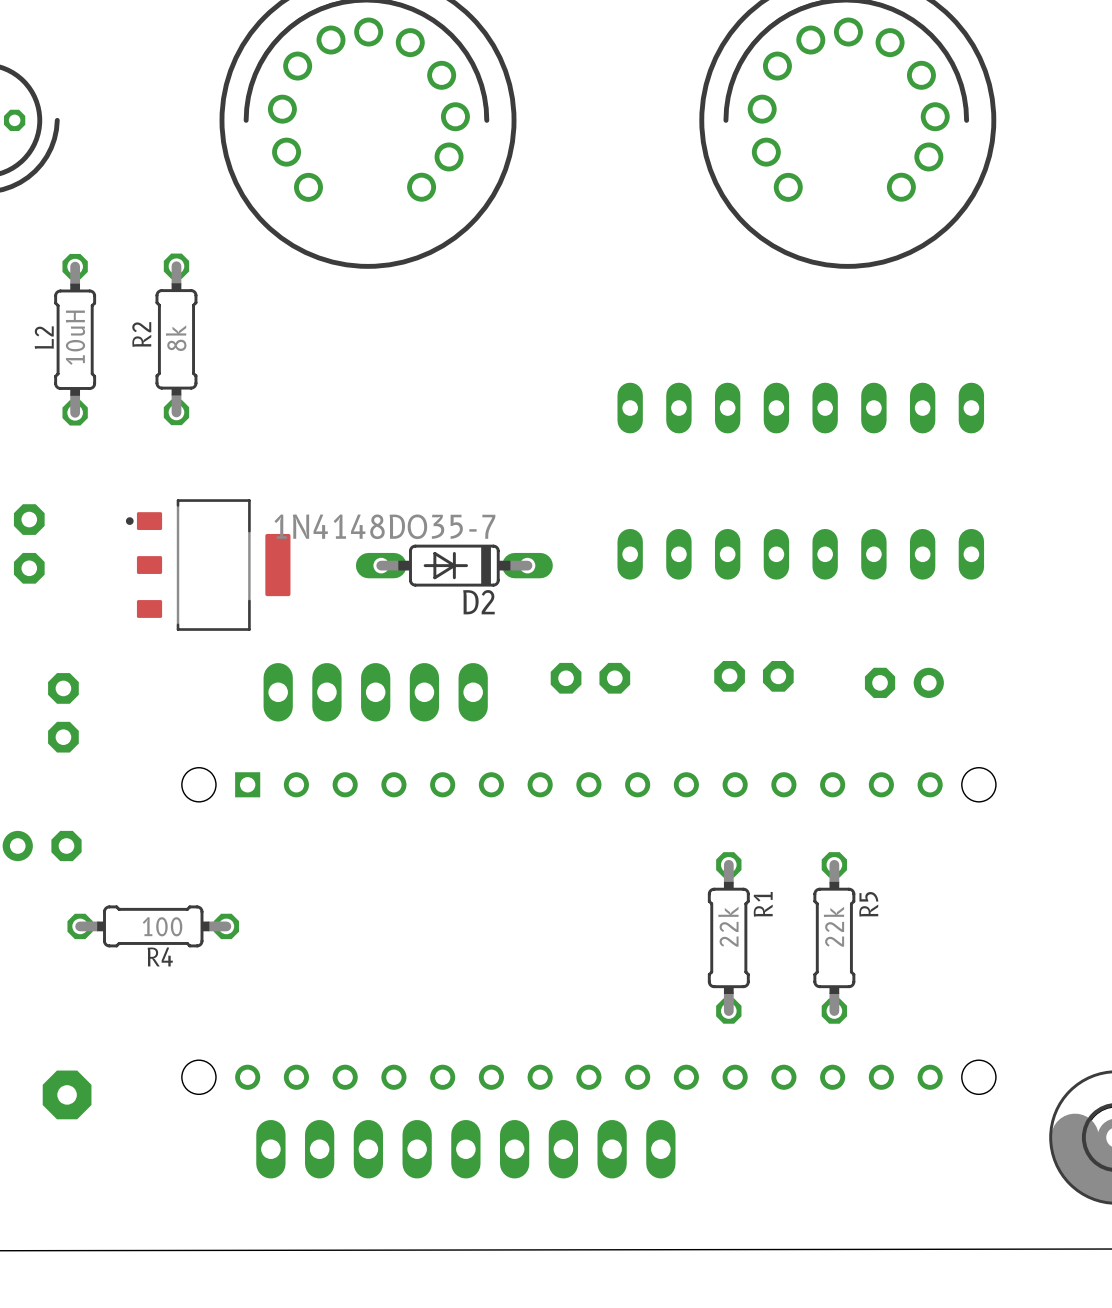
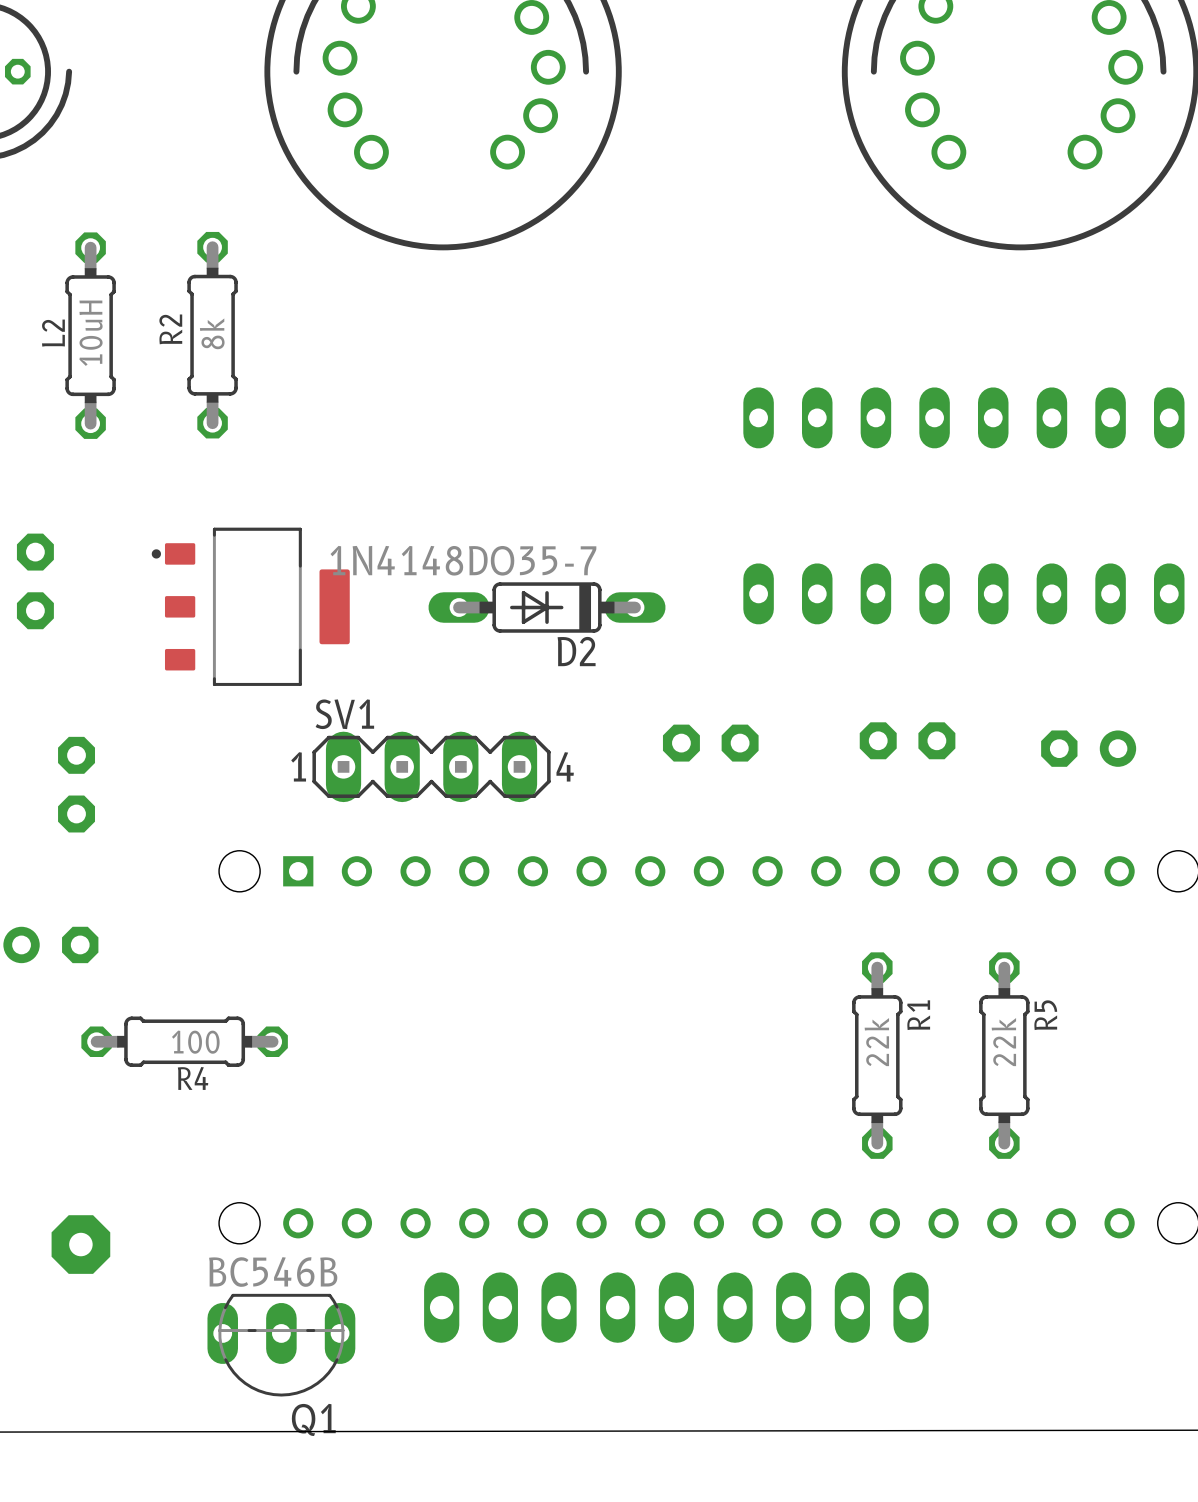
part: (375, 692) -> none
SV1: none -> (431, 766)
part position: (465, 1149) -> (676, 1307)
Q1: none -> BC546B (281, 1345)

